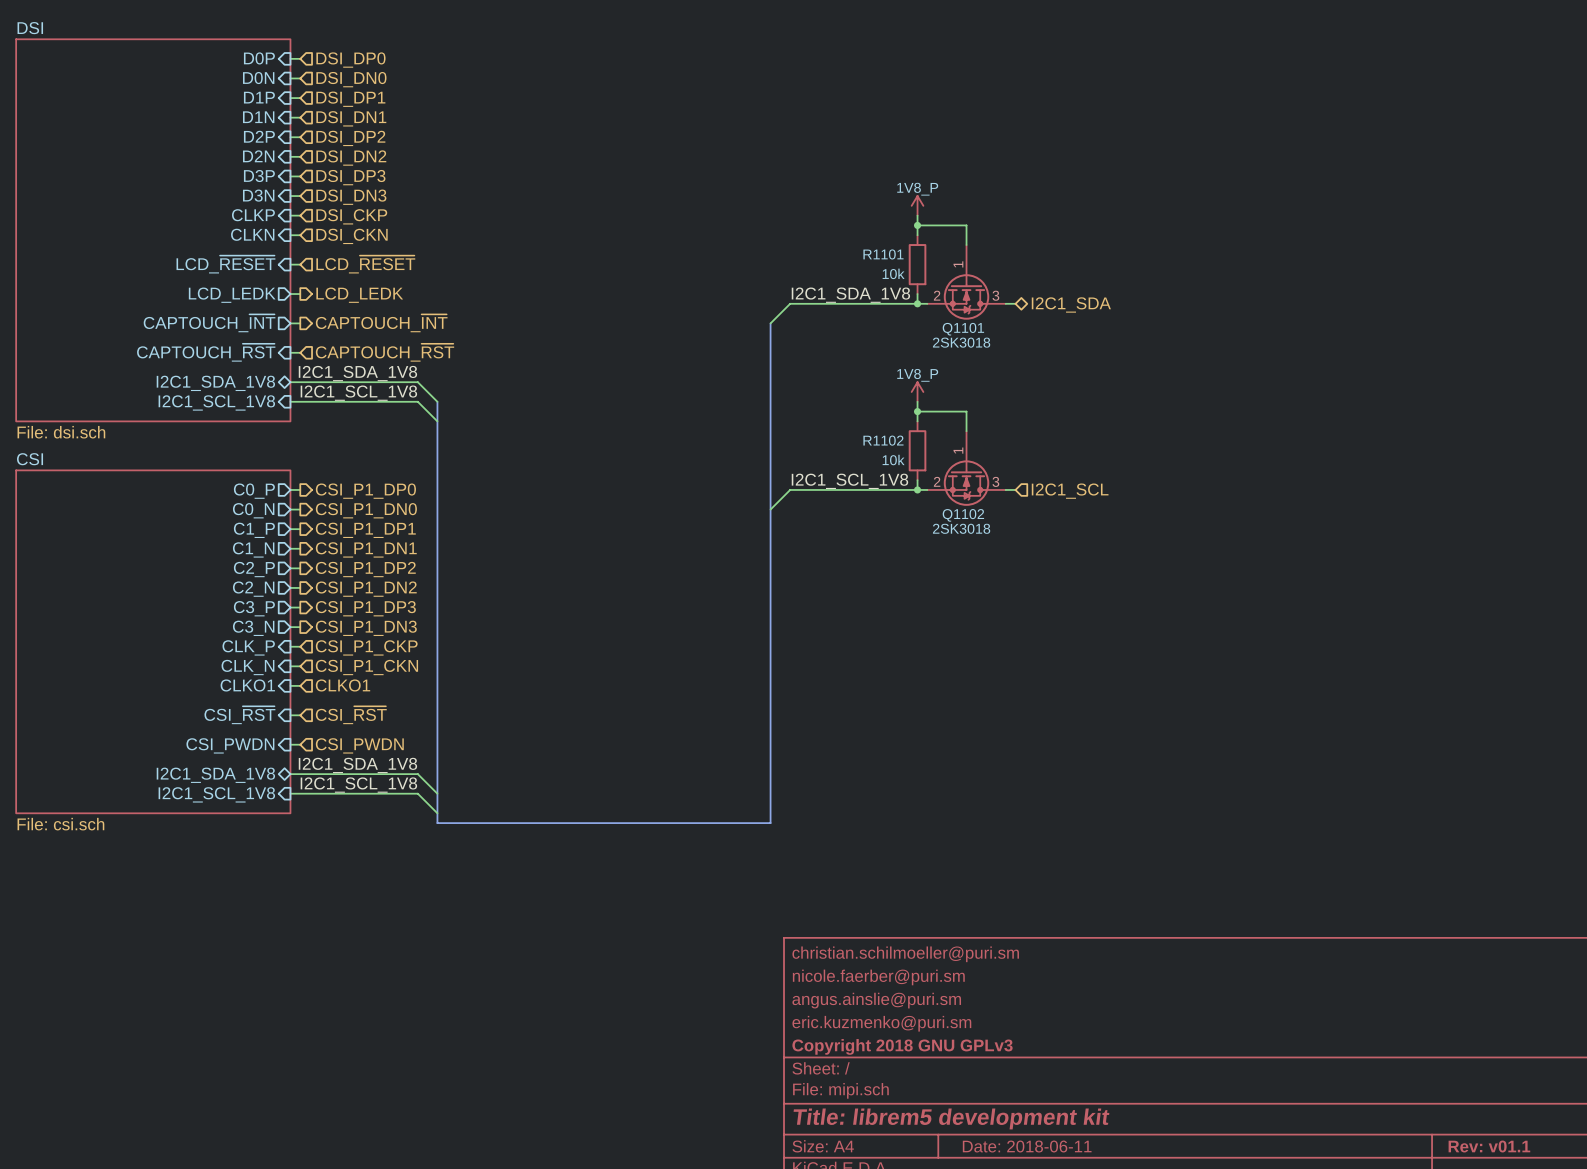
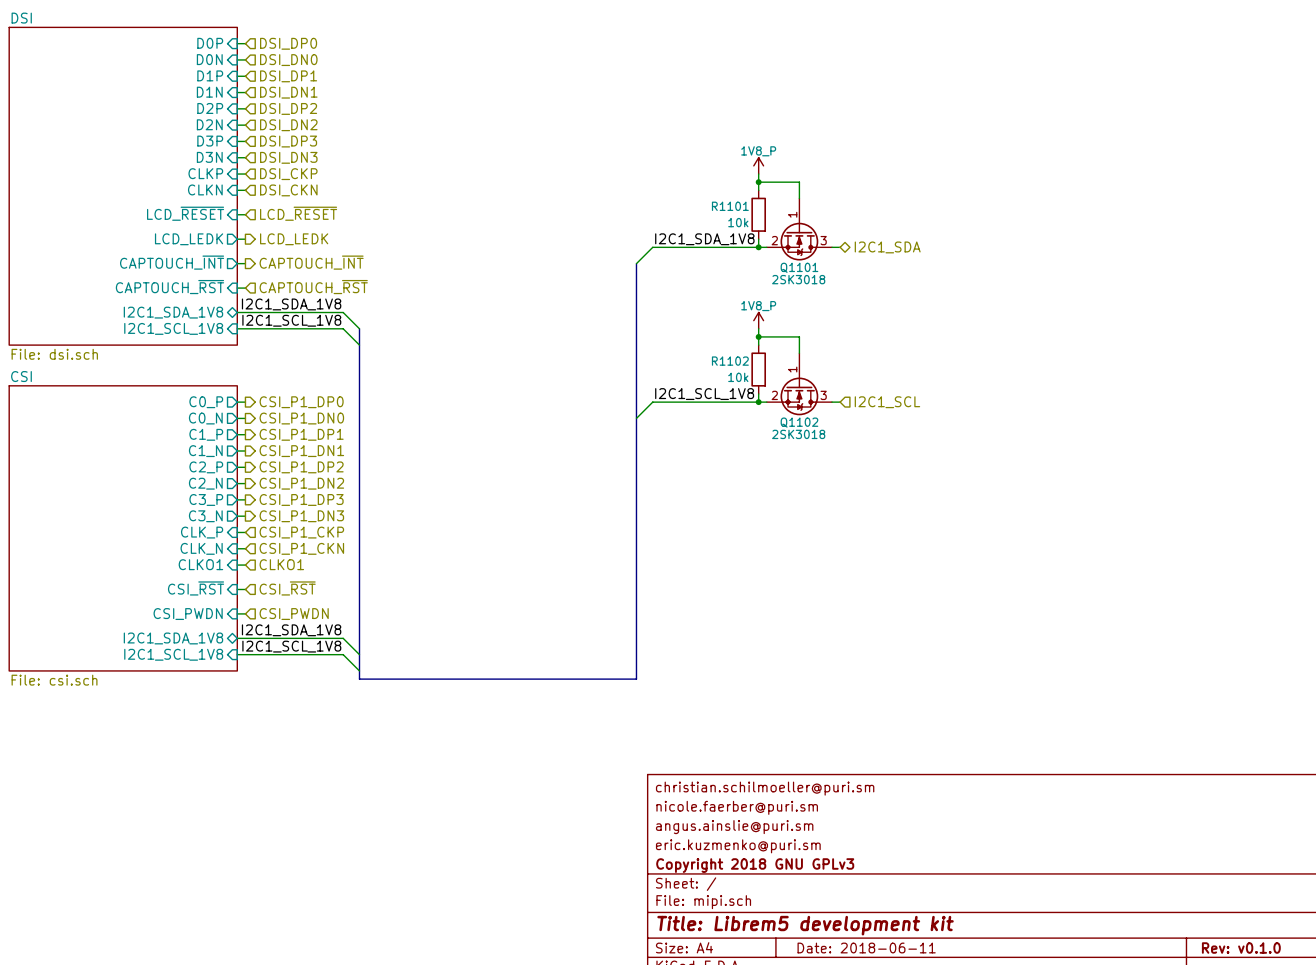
title block: Title: librem5 development kit (951, 1118) -> Title: Librem5 development kit (805, 925)
title block: Rev: v01.1 (1489, 1146) -> Rev: v0.1.0 (1241, 948)

